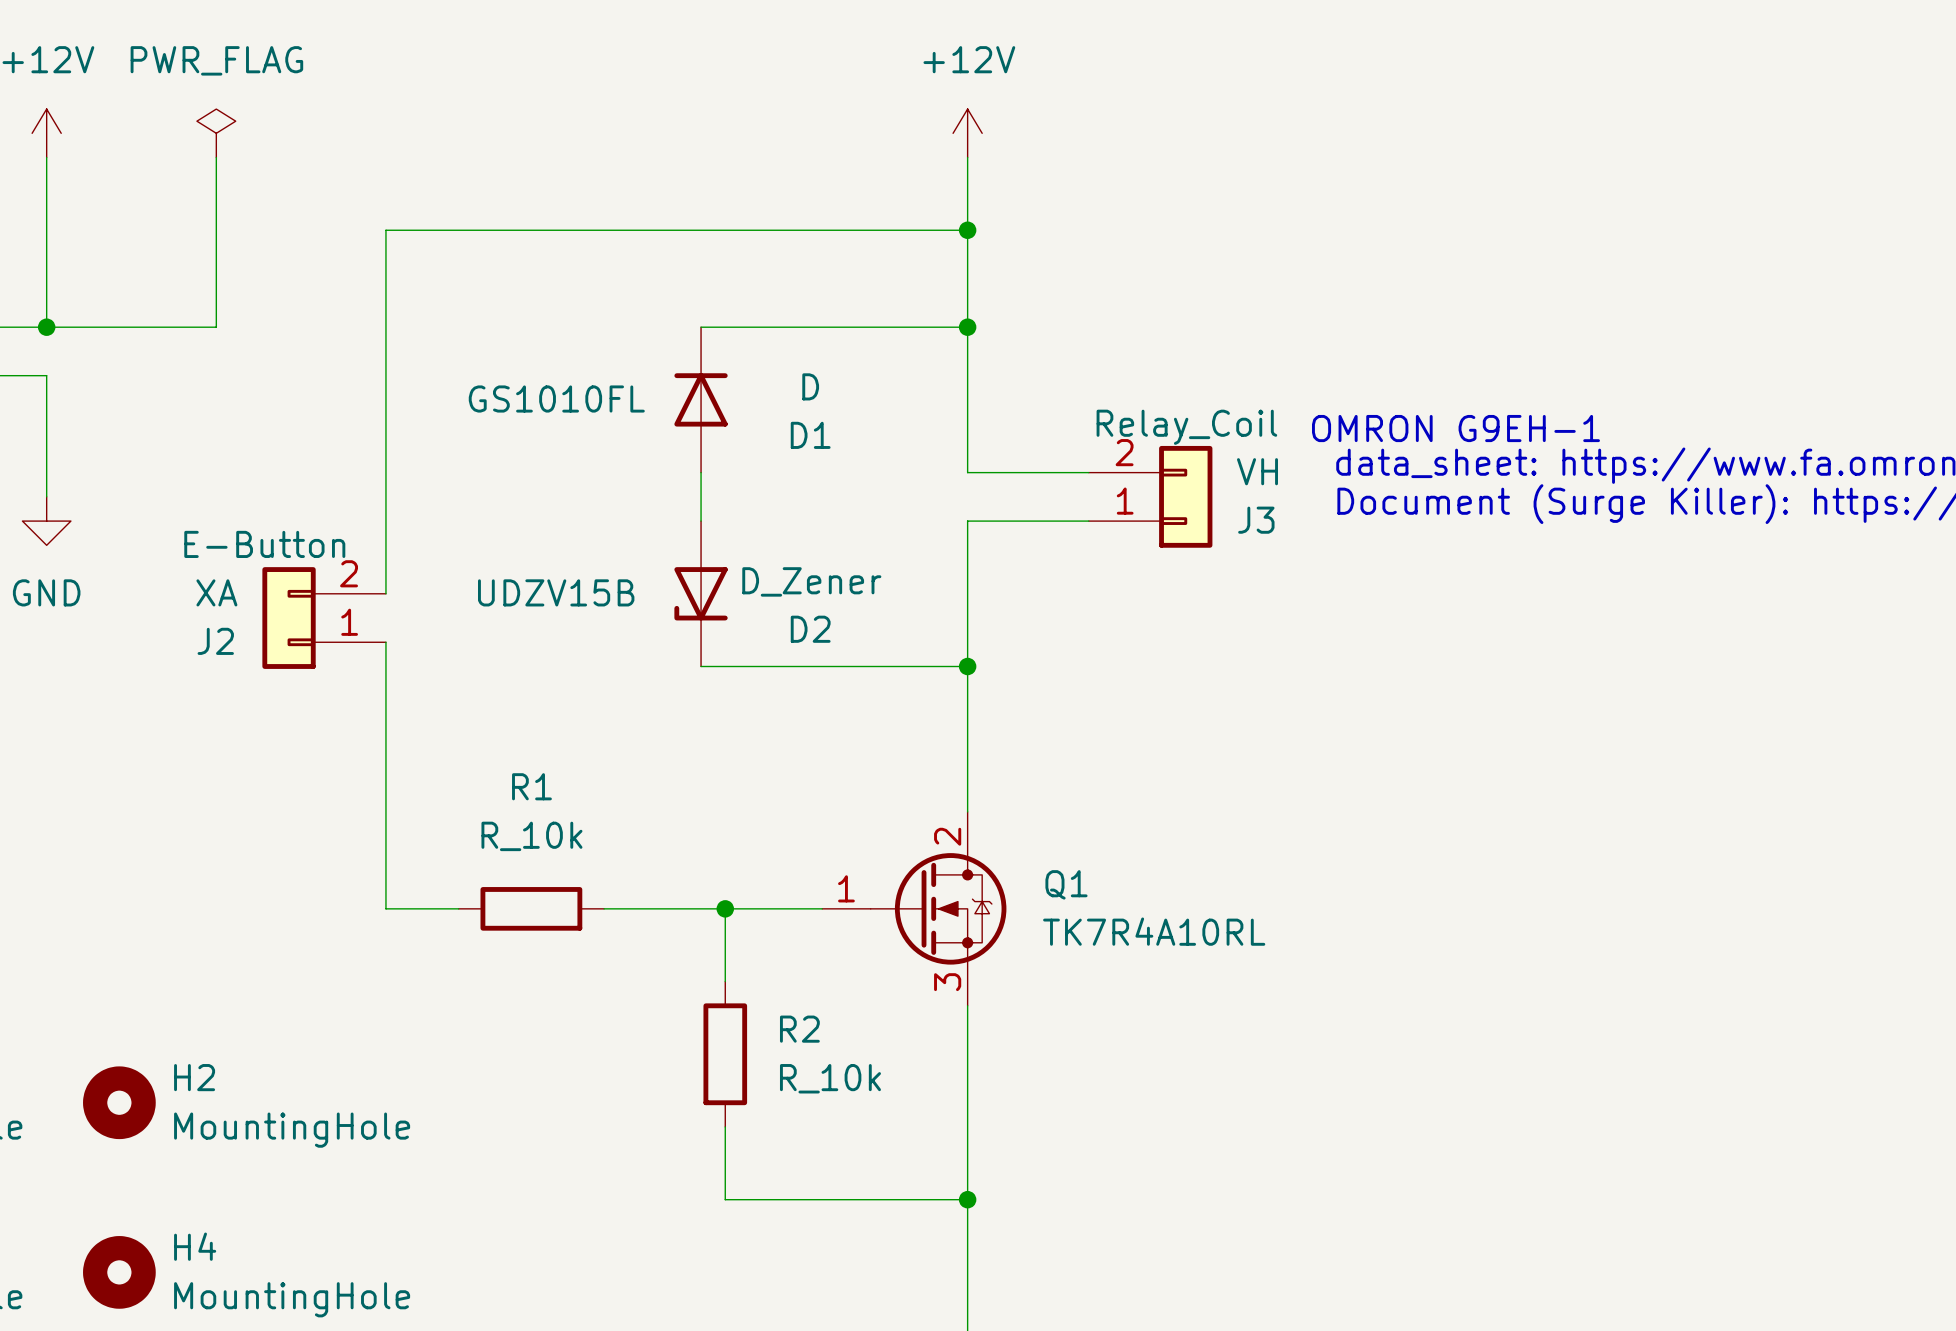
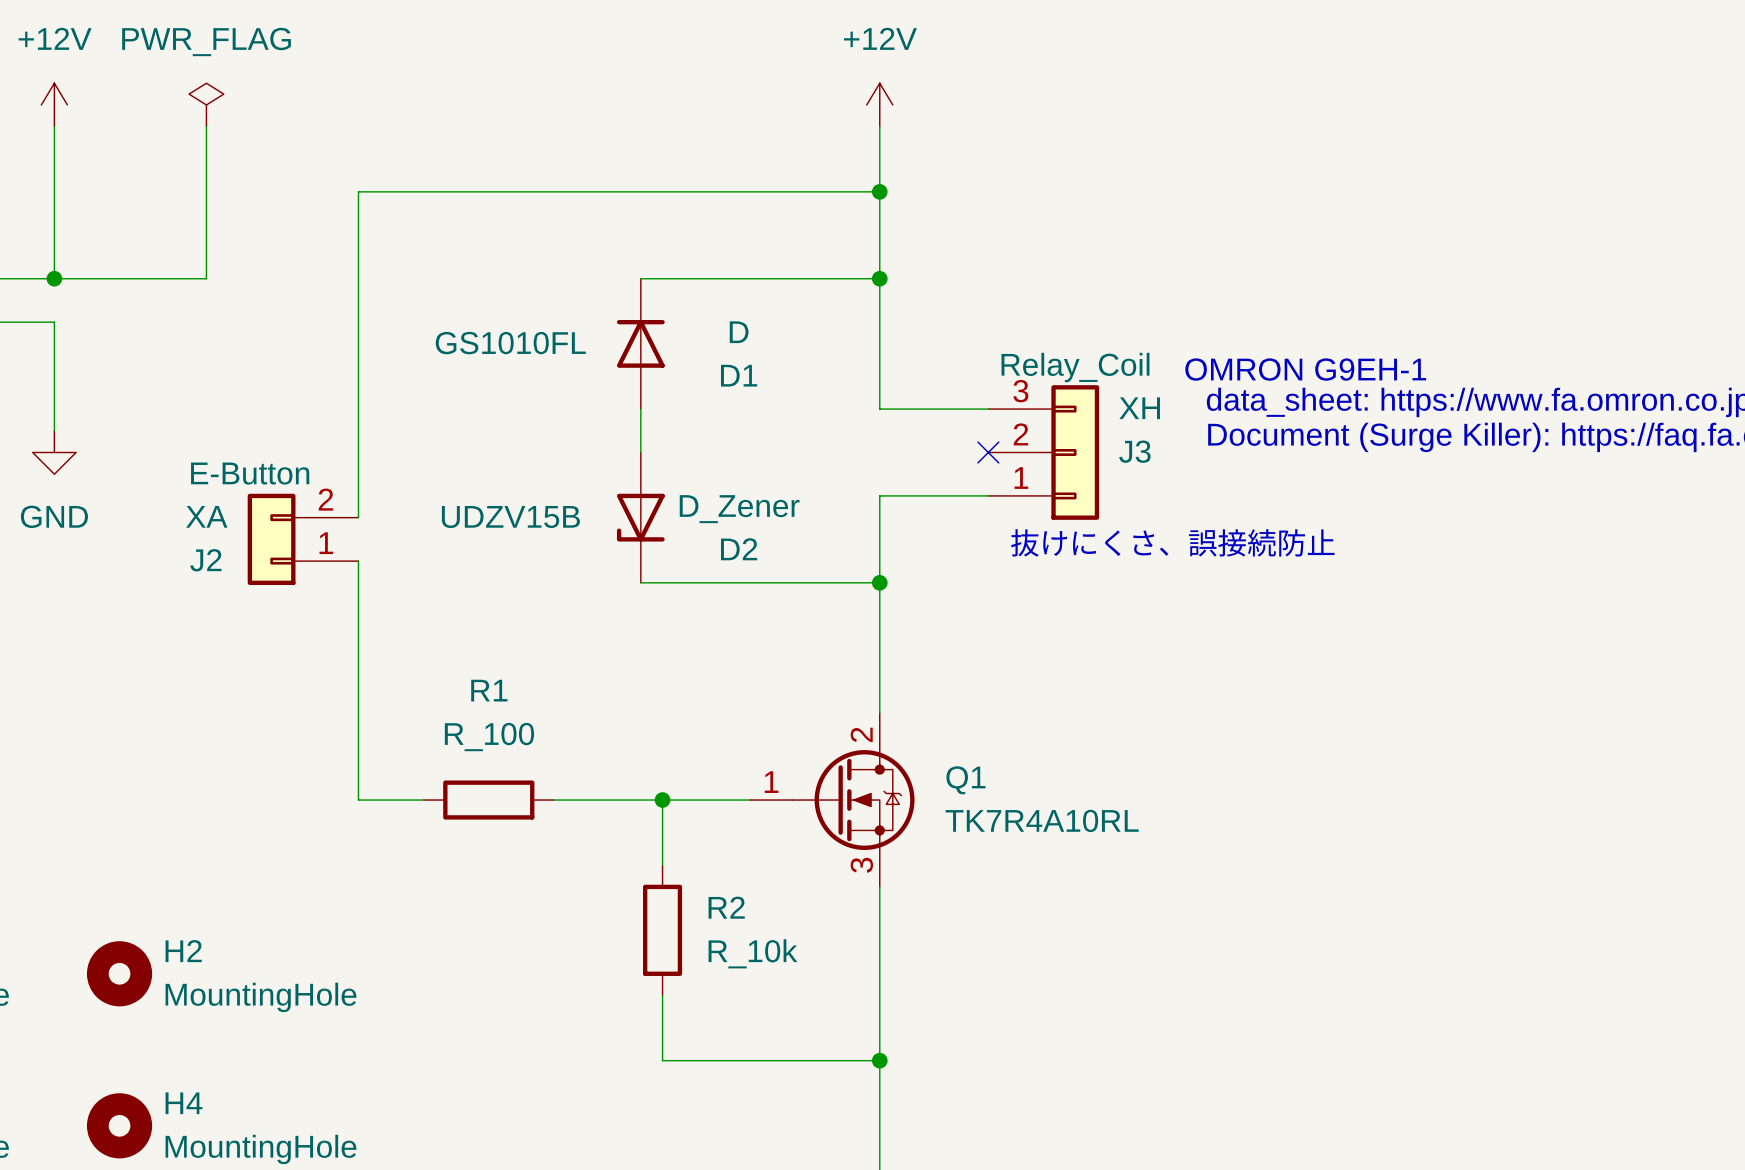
J3 symbol: [1088, 445, 1213, 548] -> [988, 385, 1100, 520]
J3 value: VH (1257, 471) -> XH (1139, 408)
wire: (1088, 521) (967, 521) (967, 569) -> (988, 495) (879, 495)
no-connect mark: none -> (988, 452)
text: none -> 抜けにくさ、誤接続防止 (1172, 542)
R1 value: R_10k (531, 836) -> R_100 (489, 737)

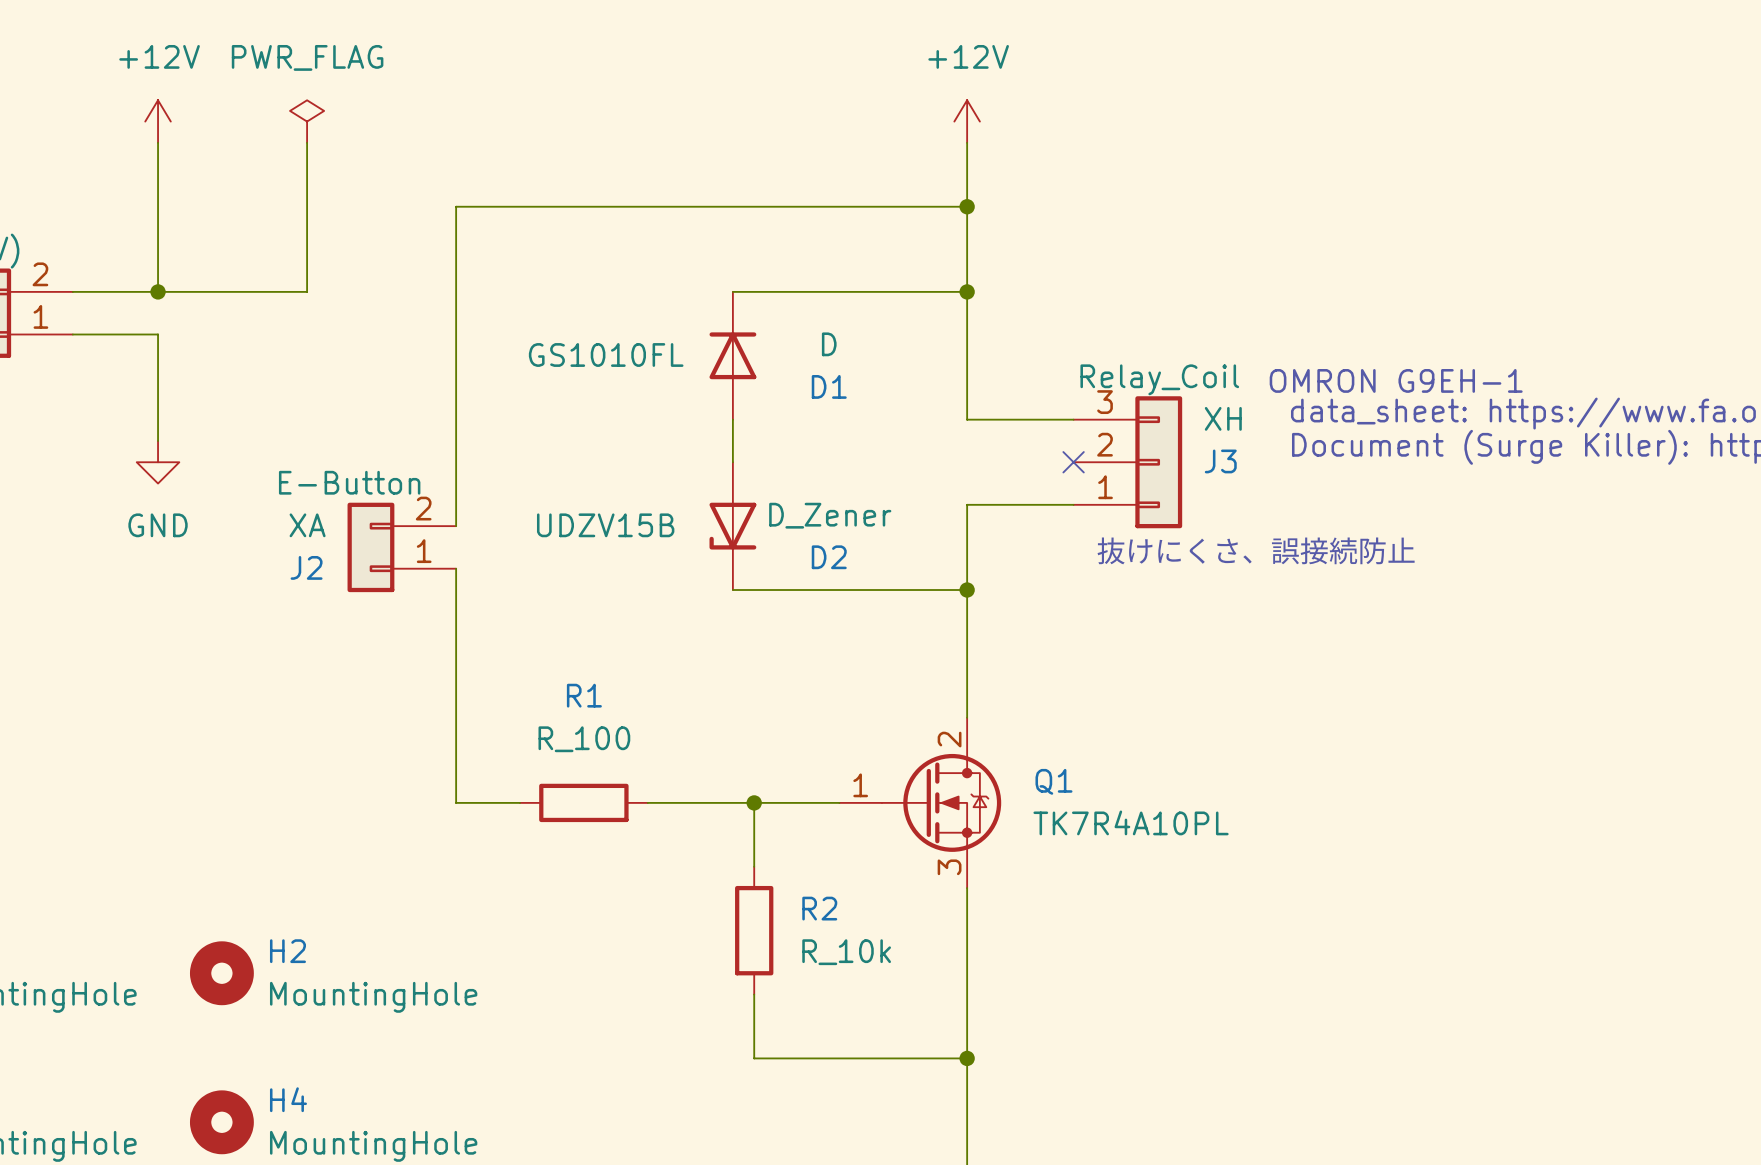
Q1 value: TK7R4A10RL (1042, 820) -> TK7R4A10PL (1131, 822)

